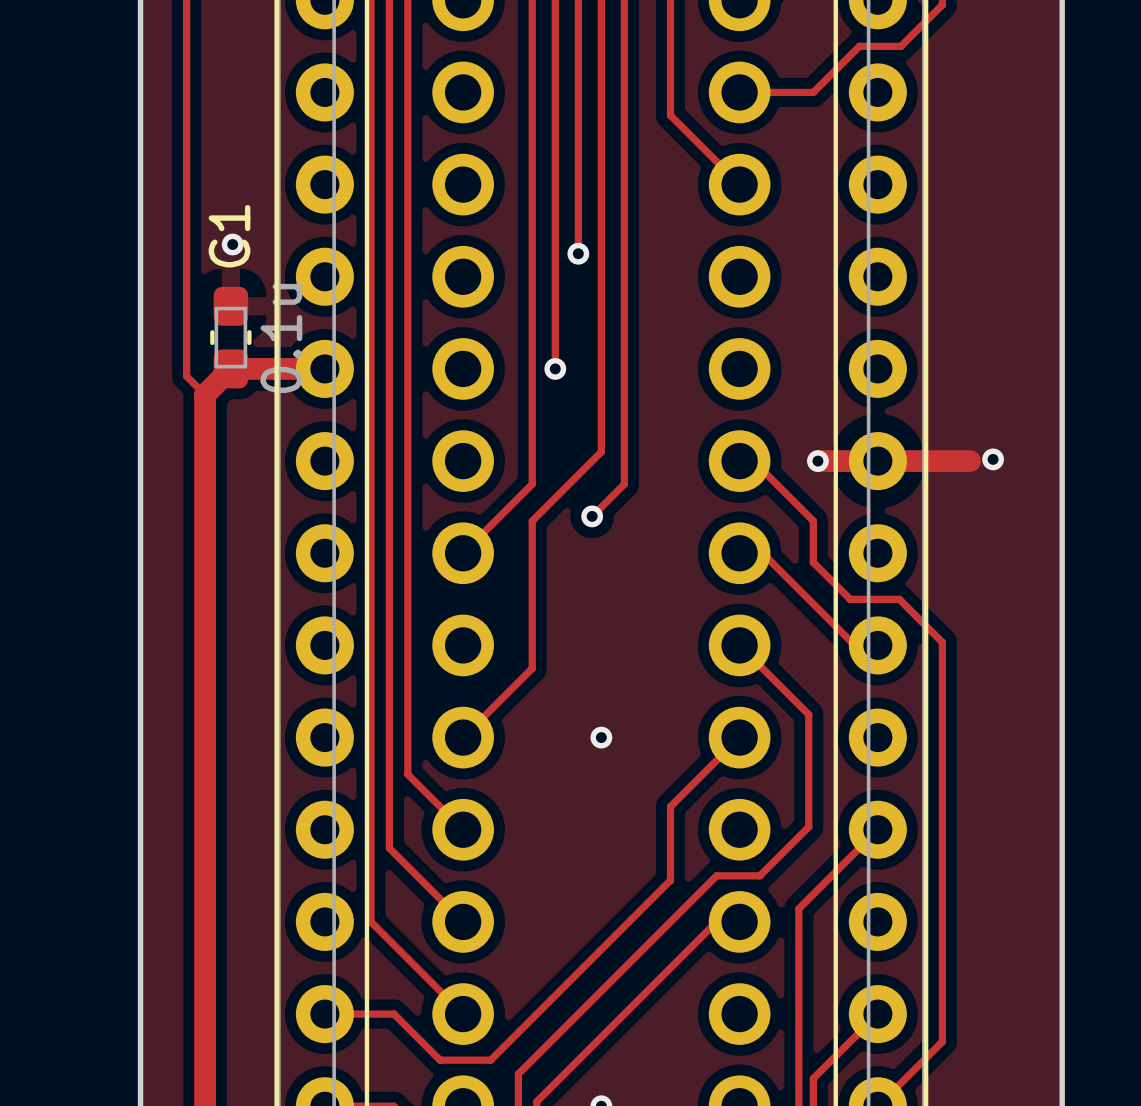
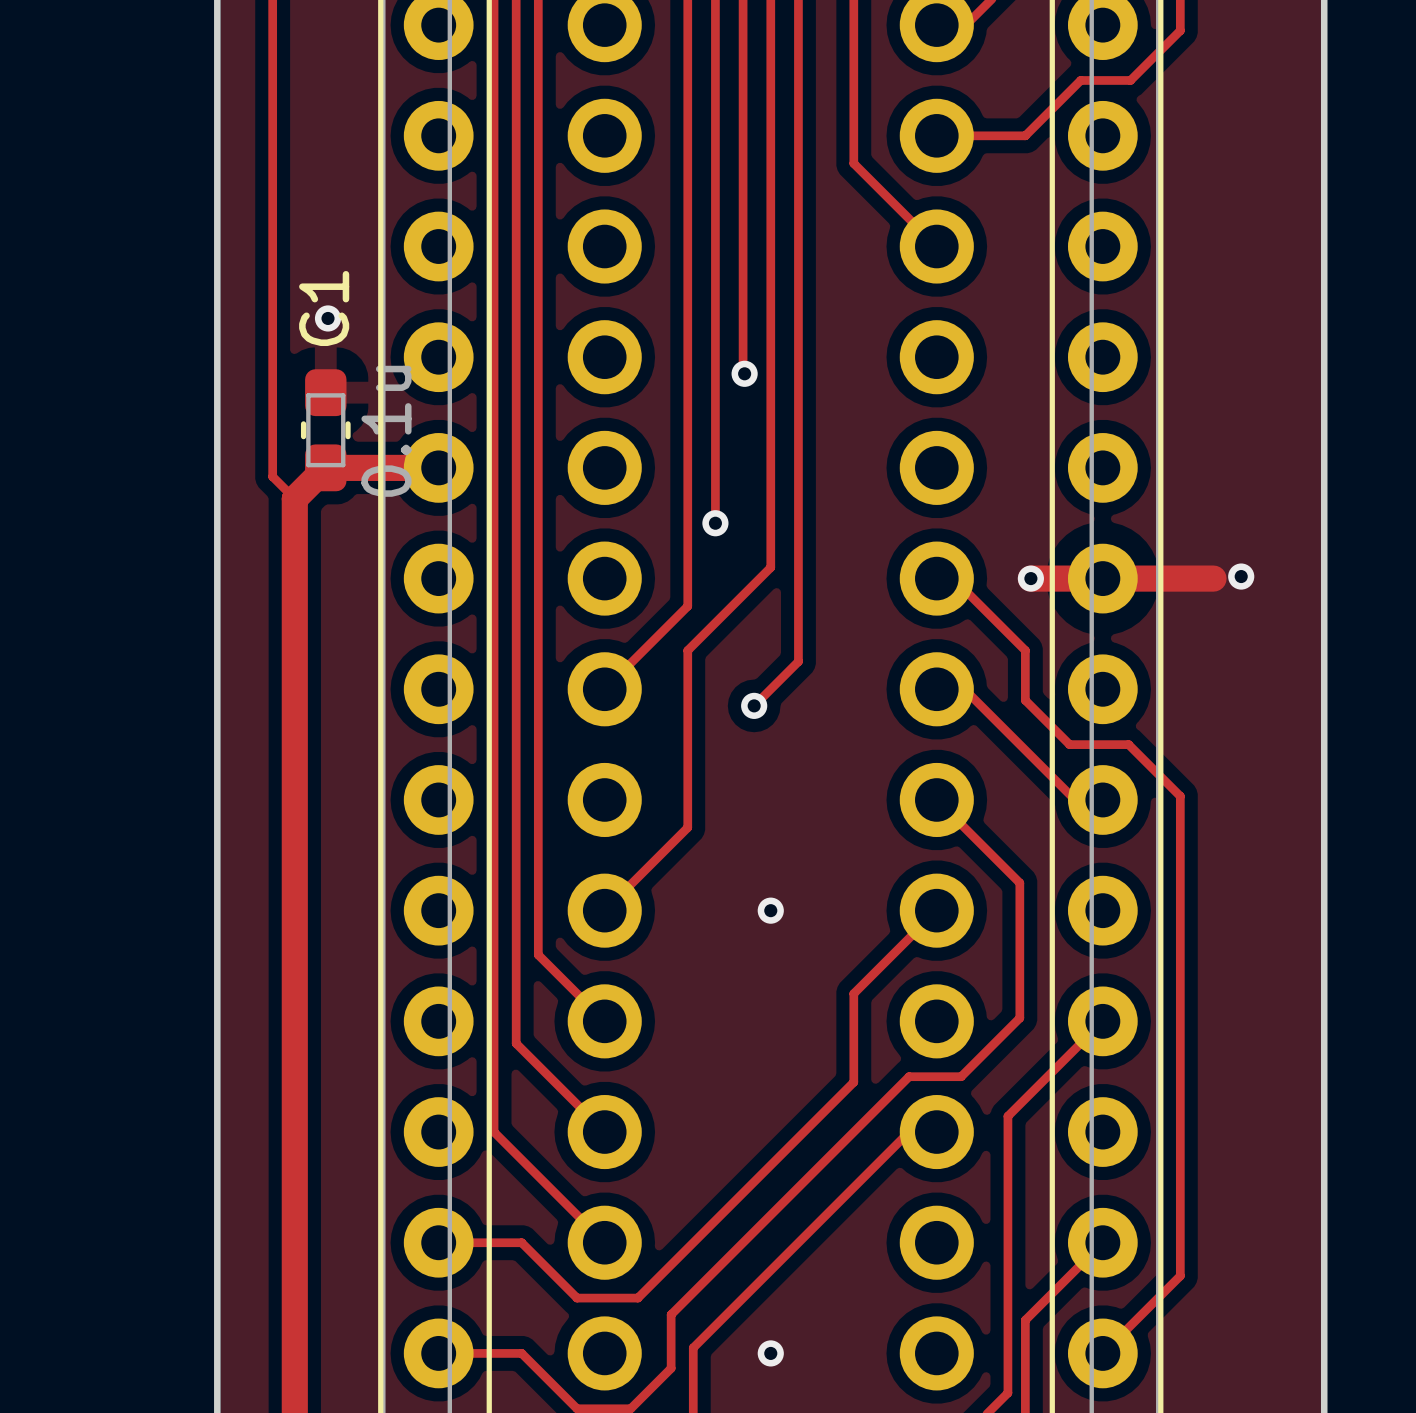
track: none -> (743, 329) (744, 373)
via position: (578, 253) -> (744, 373)
track: none -> (715, 467) (715, 523)
via: (555, 368) -> none
via: none -> (715, 523)
track: (624, 484) (592, 516) -> (798, 606) (798, 661) (754, 705)
via position: (592, 516) -> (754, 705)

